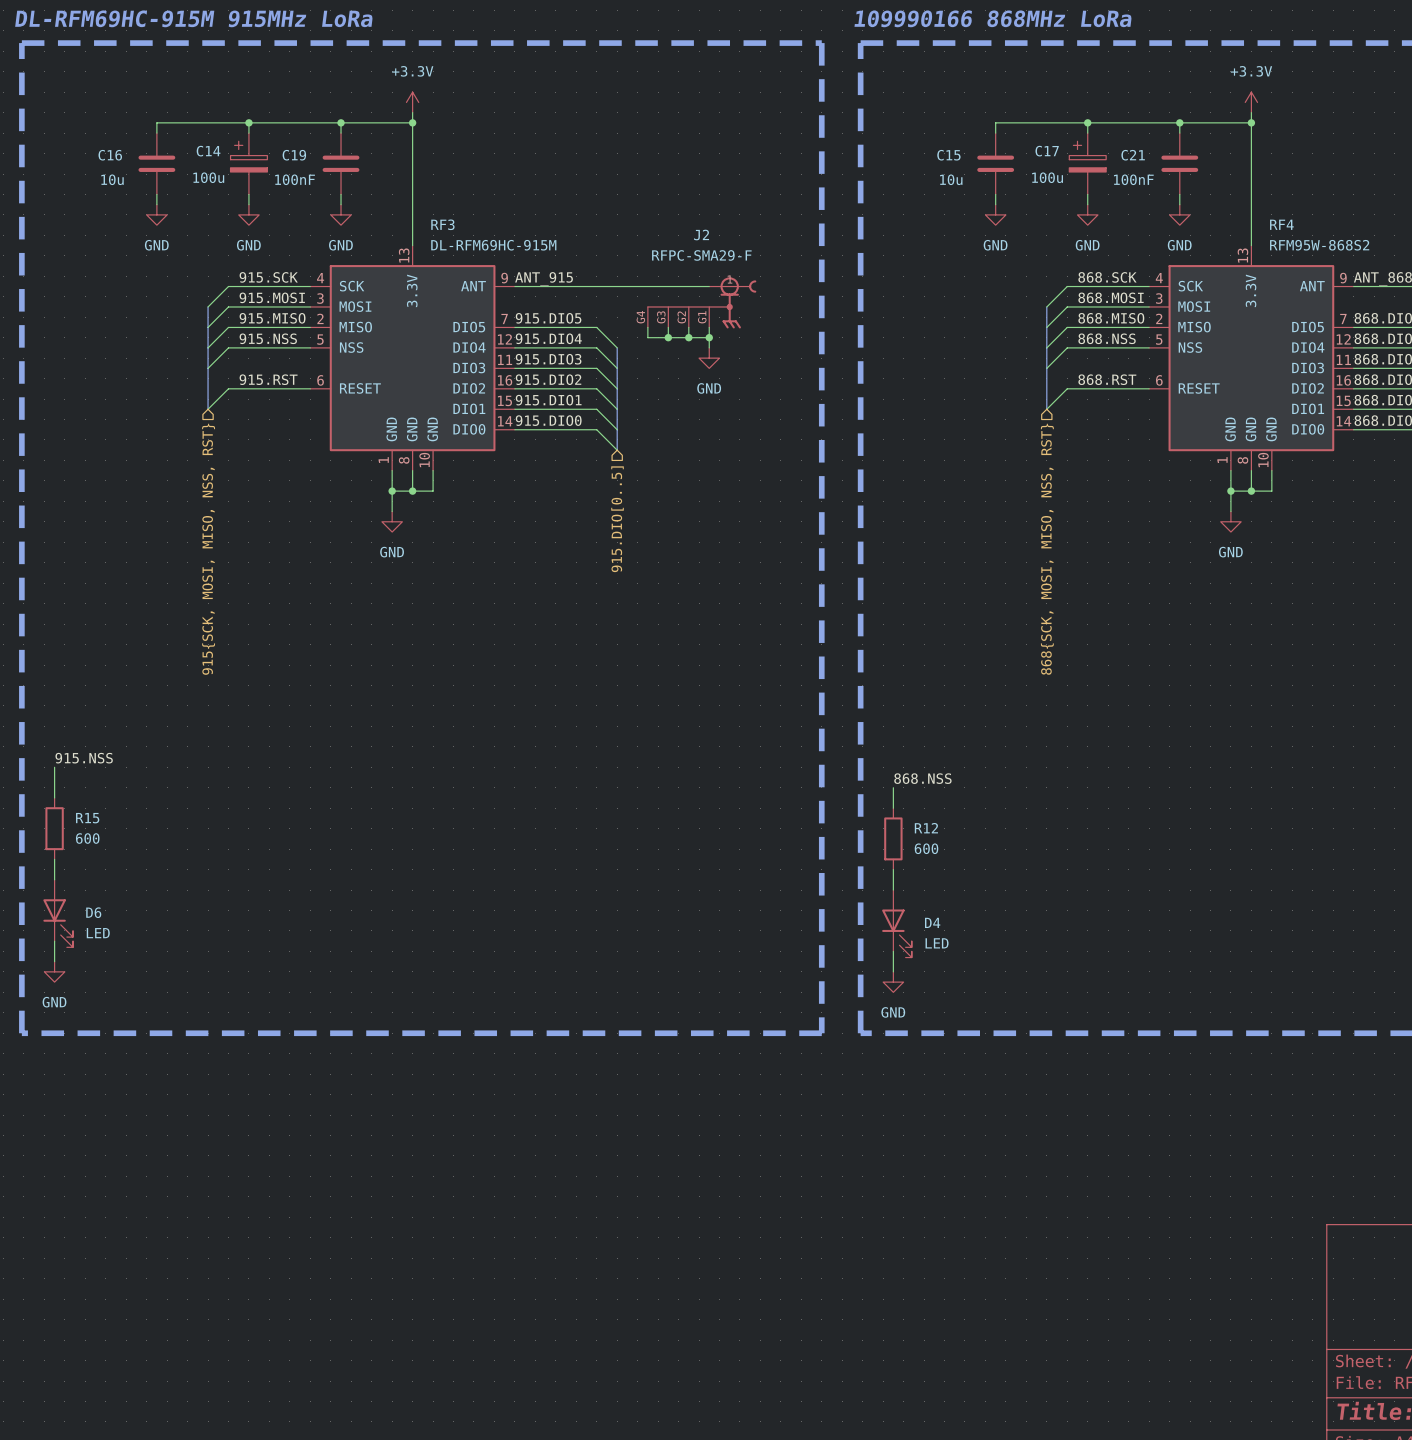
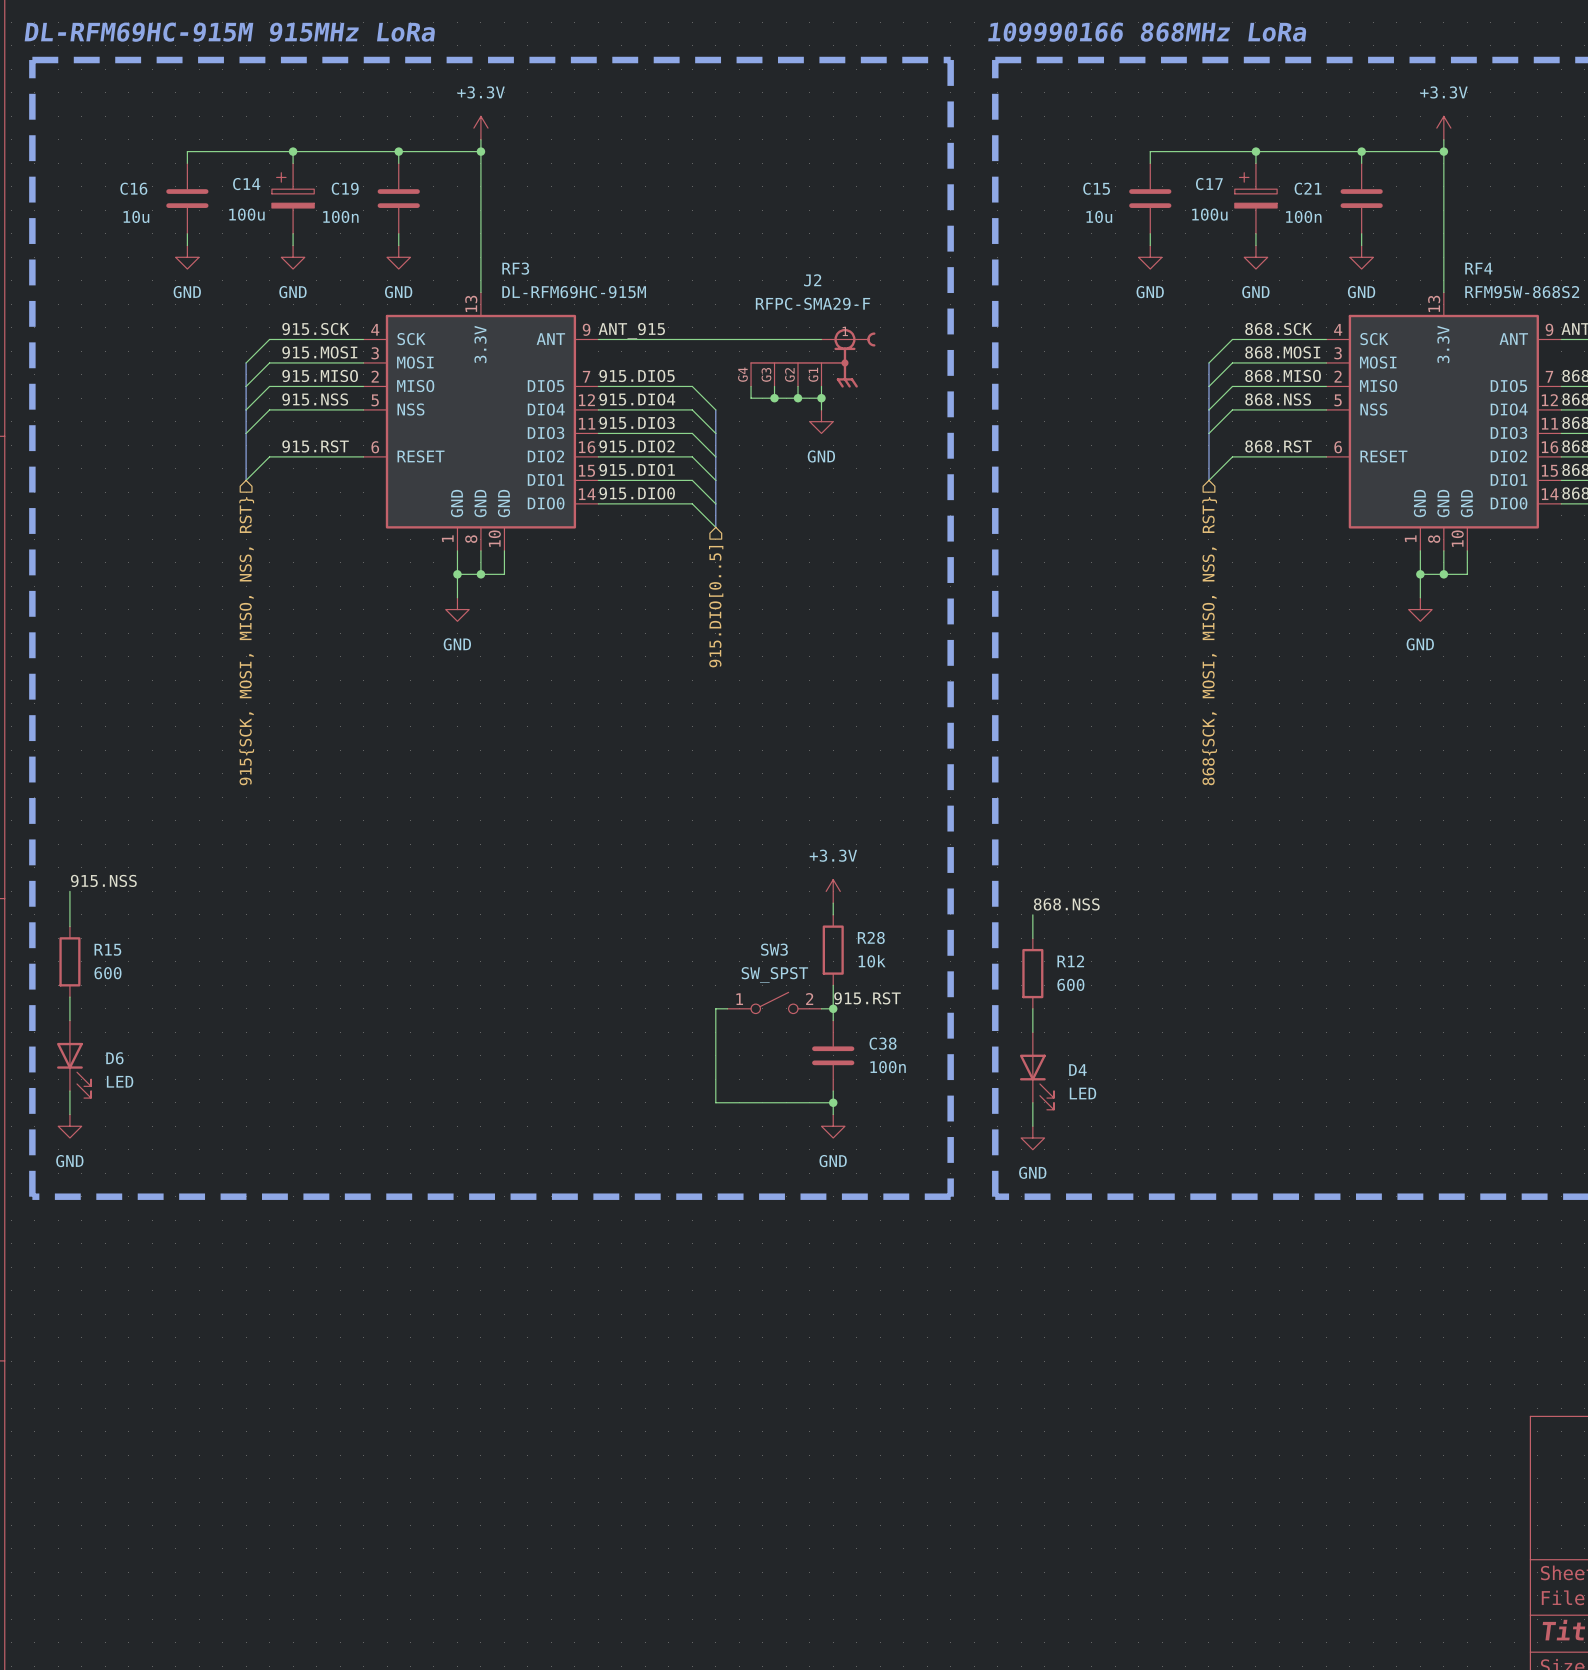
C19 value: 100nF (295, 179) -> 100n (340, 216)
C21 value: 100nF (1133, 179) -> 100n (1303, 216)
power symbol: none -> +3.3V (833, 891)
wire: none -> (833, 903) (833, 914)
R28: none -> 10k (833, 950)
wire: none -> (833, 985) (833, 1020)
label: none -> 915.RST (867, 998)
SW3: none -> SW_SPST (774, 1002)
wire: none -> (727, 1008) (715, 1008) (715, 1102) (833, 1102)
wire: none -> (821, 1008) (833, 1008)
junction: none -> (833, 1008)
C38: none -> 100n (833, 1055)
wire: none -> (833, 1091) (833, 1114)
junction: none -> (833, 1102)
power symbol: none -> GND (833, 1126)

